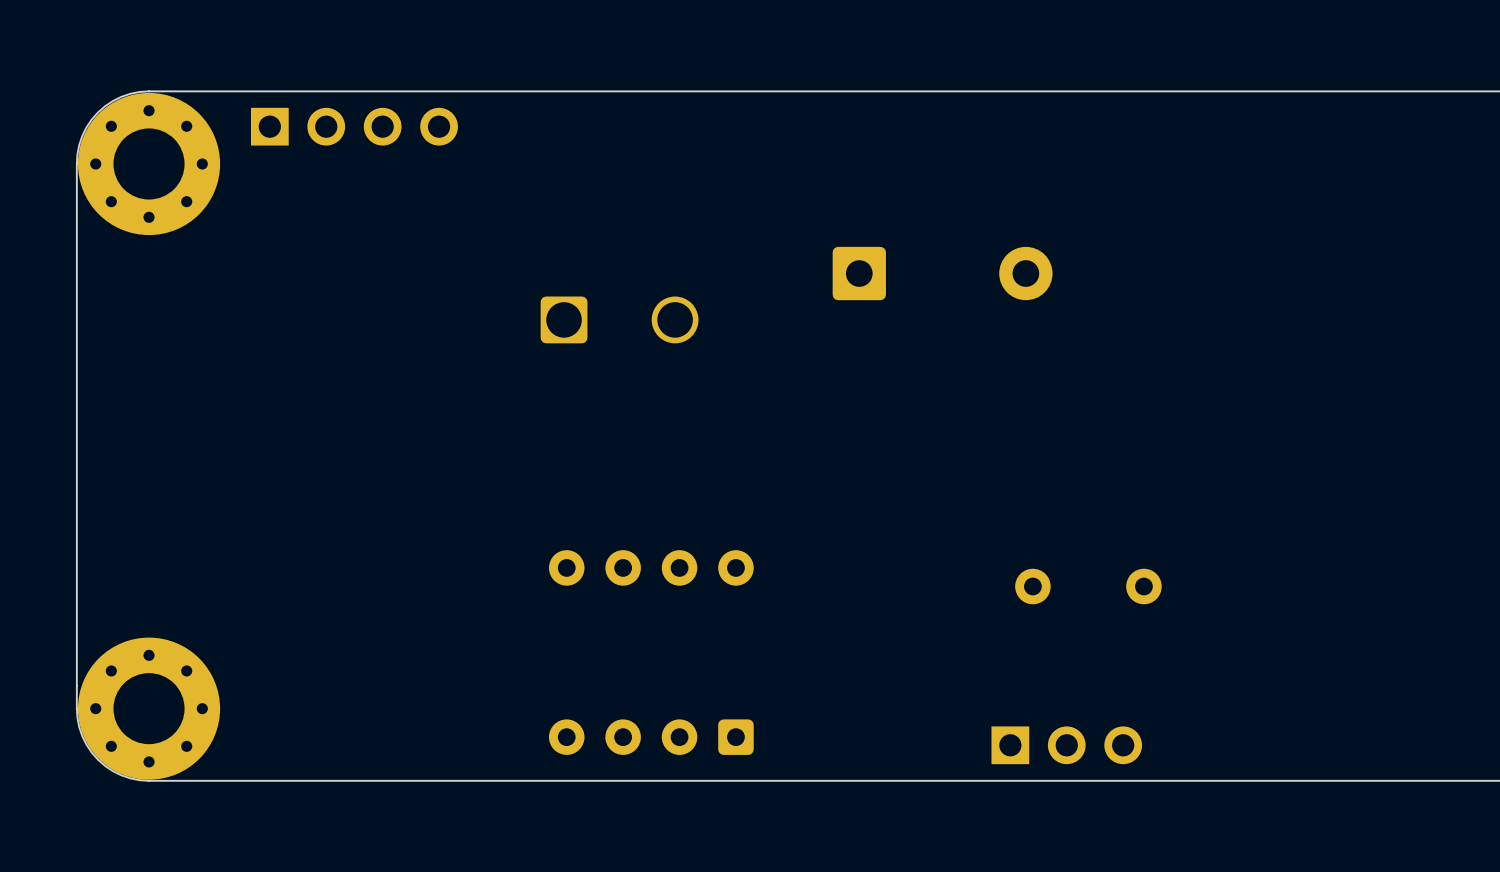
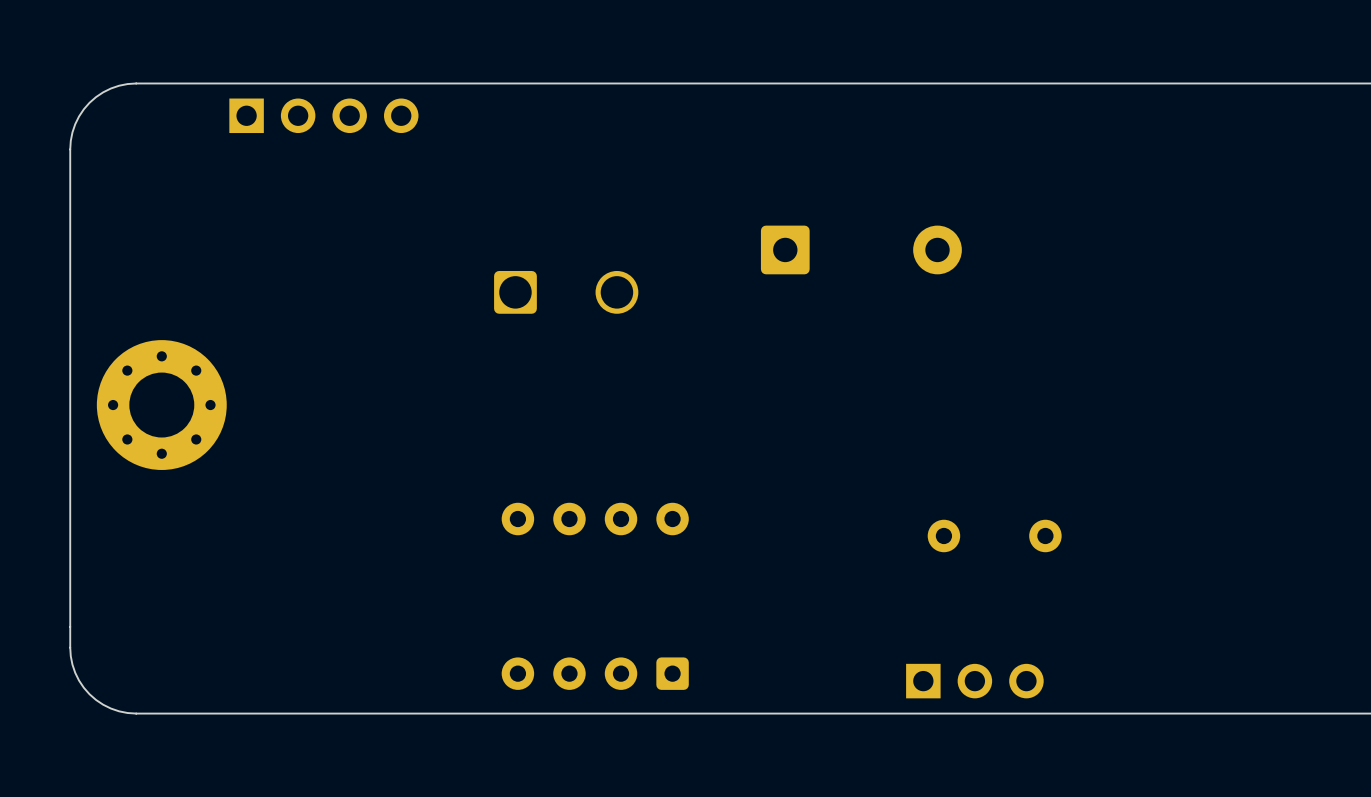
part: (149, 163) -> none
part: none -> (161, 405)
part: (149, 708) -> none

